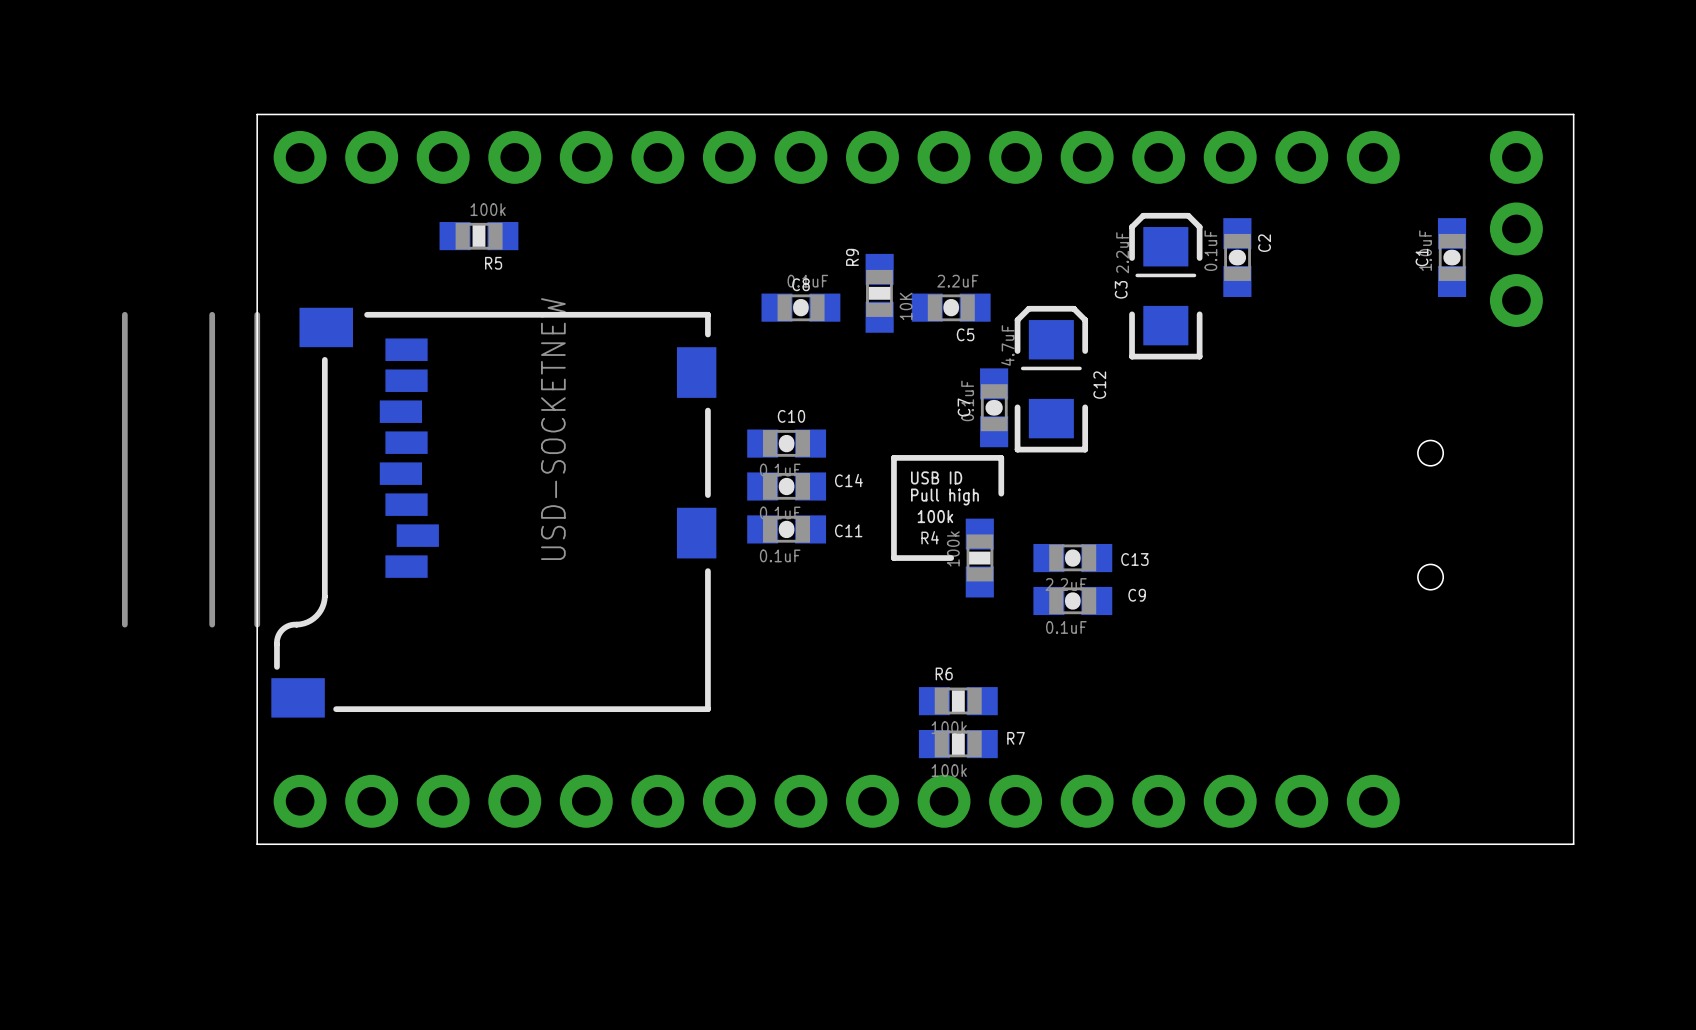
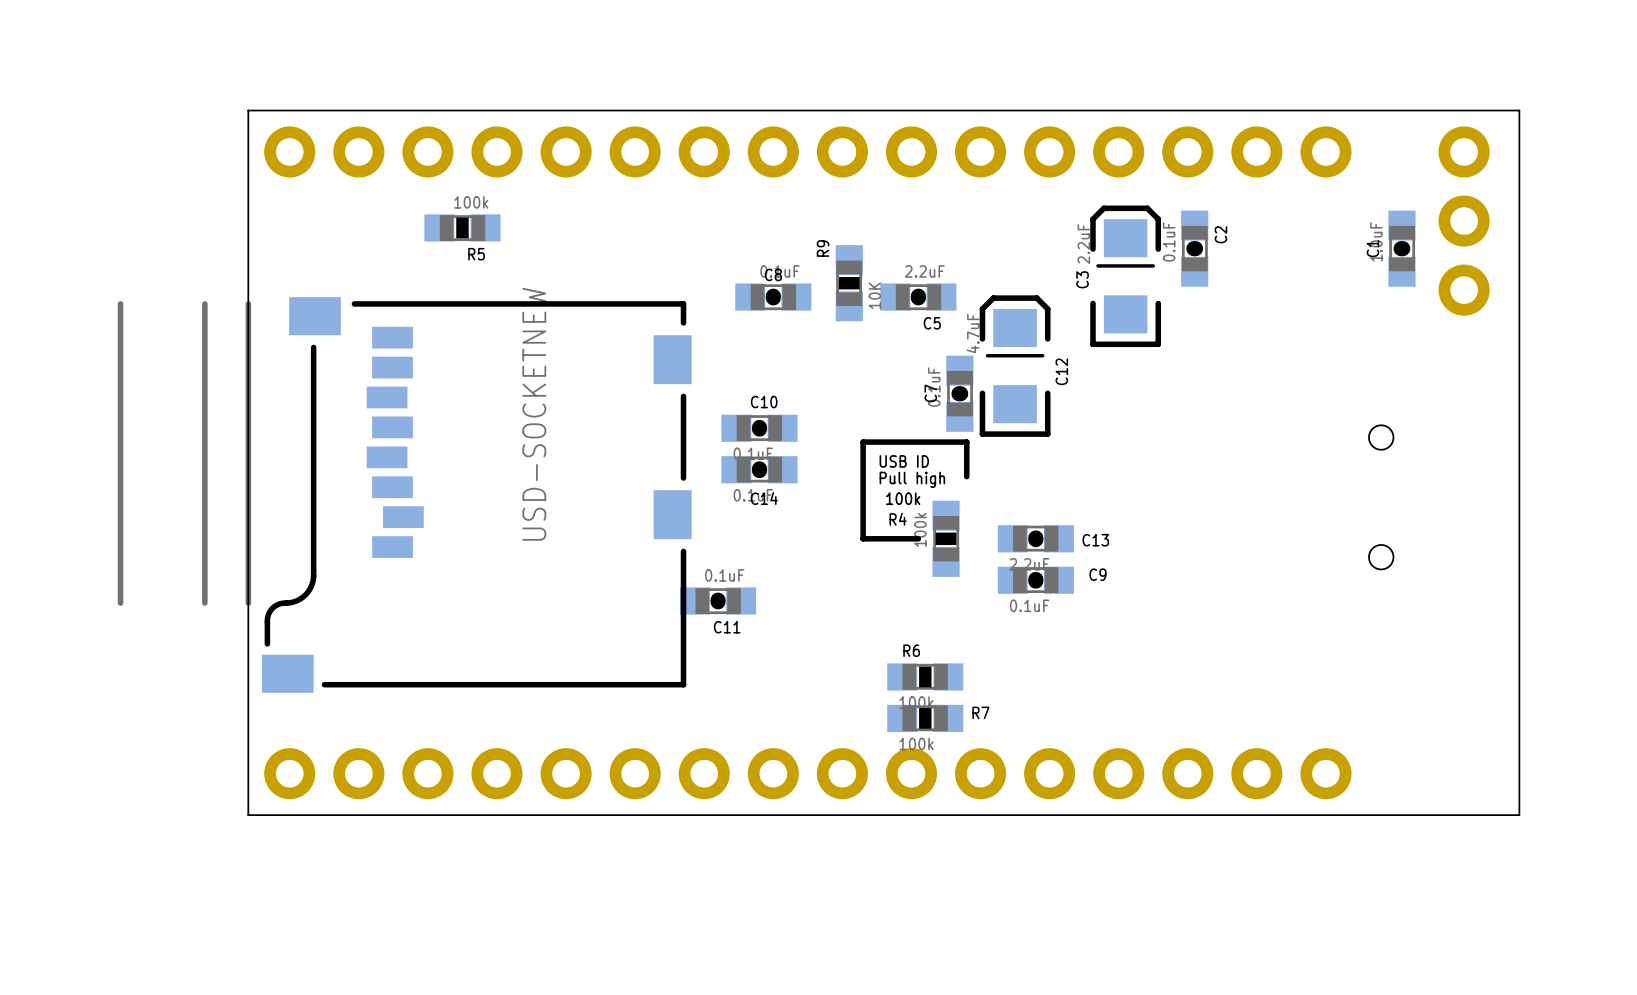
C14 name position: C14 (848, 480) -> C14 (764, 498)
C11 position: (786, 529) -> (718, 600)
C11 name position: C11 (848, 530) -> C11 (727, 627)
C11 value position: 0.1uF (780, 555) -> 0.1uF (724, 575)

